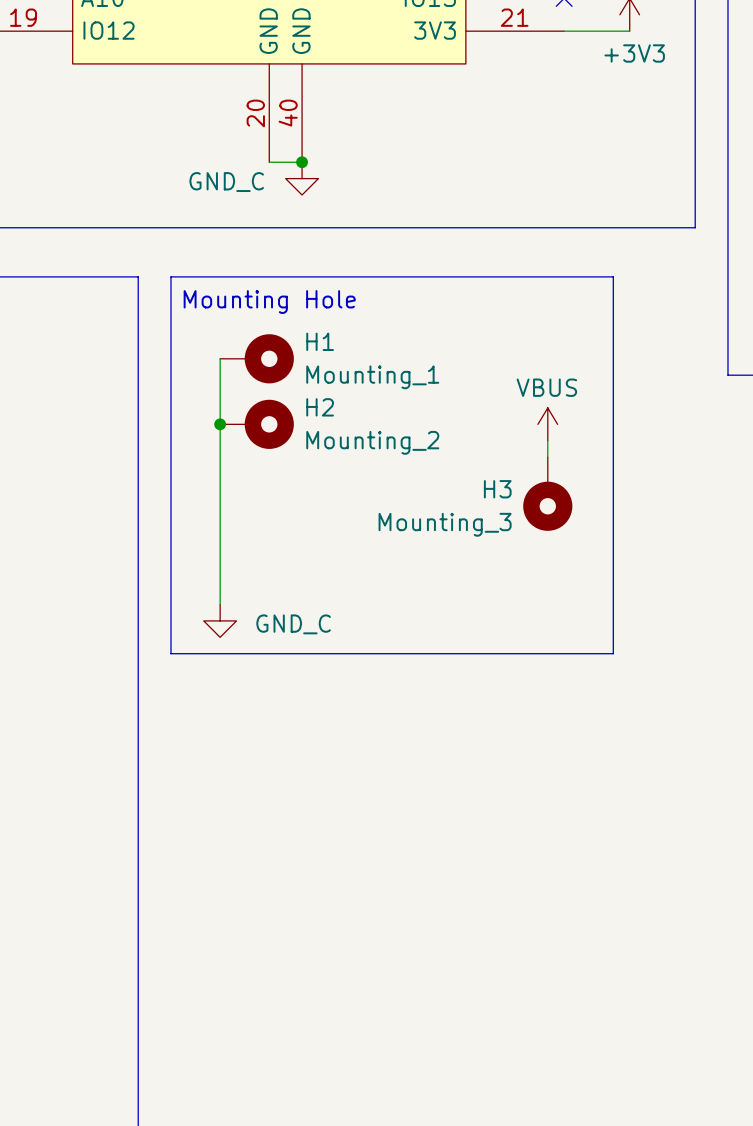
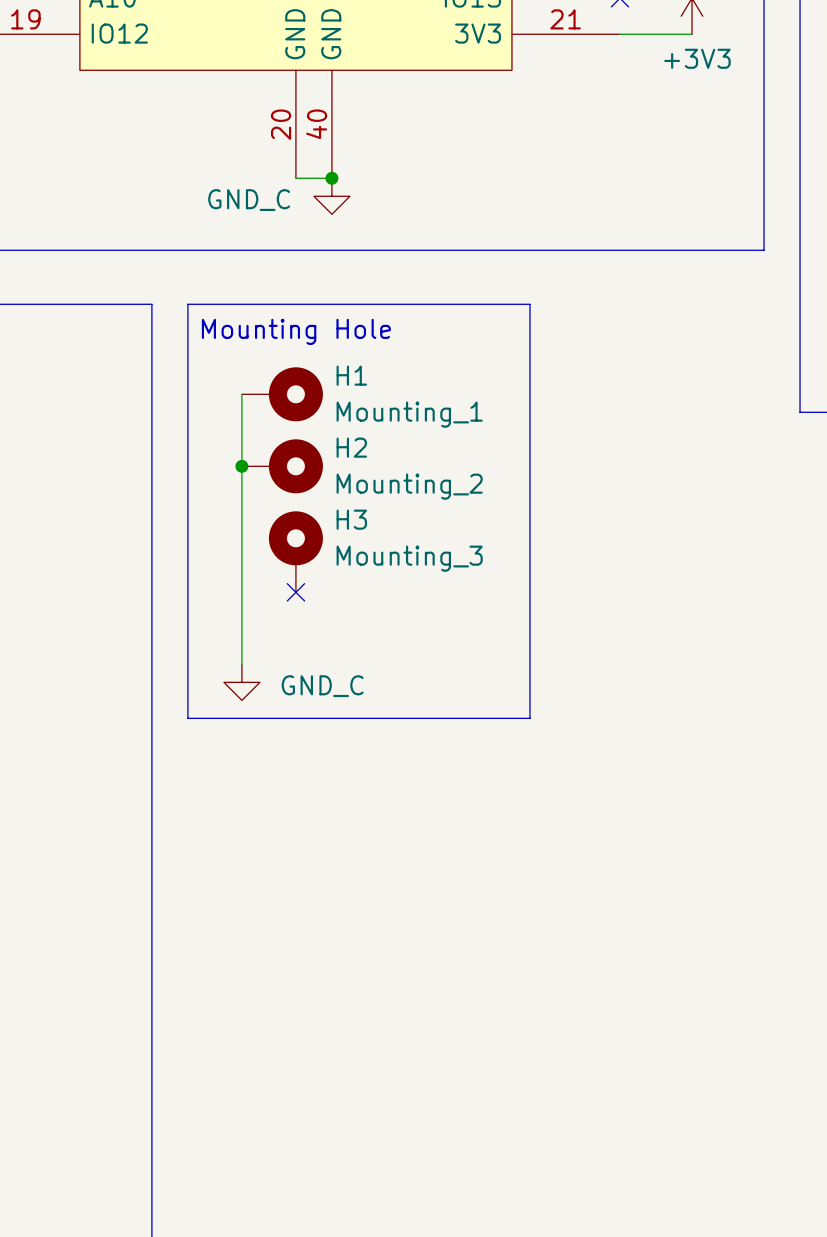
line: (482, 276) (613, 276) (613, 653) (482, 653) -> (529, 304) (529, 718)
power symbol: VBUS (547, 424) -> none
wire: (547, 440) (547, 457) -> none
H3 name position: H3 (497, 489) -> H3 (351, 519)
H3 position: (547, 493) -> (295, 551)
H3 rotation: 0° (547, 506) -> 180° (295, 538)
H3 value position: Mounting_3 (445, 524) -> Mounting_3 (409, 558)
no-connect mark: none -> (295, 592)

